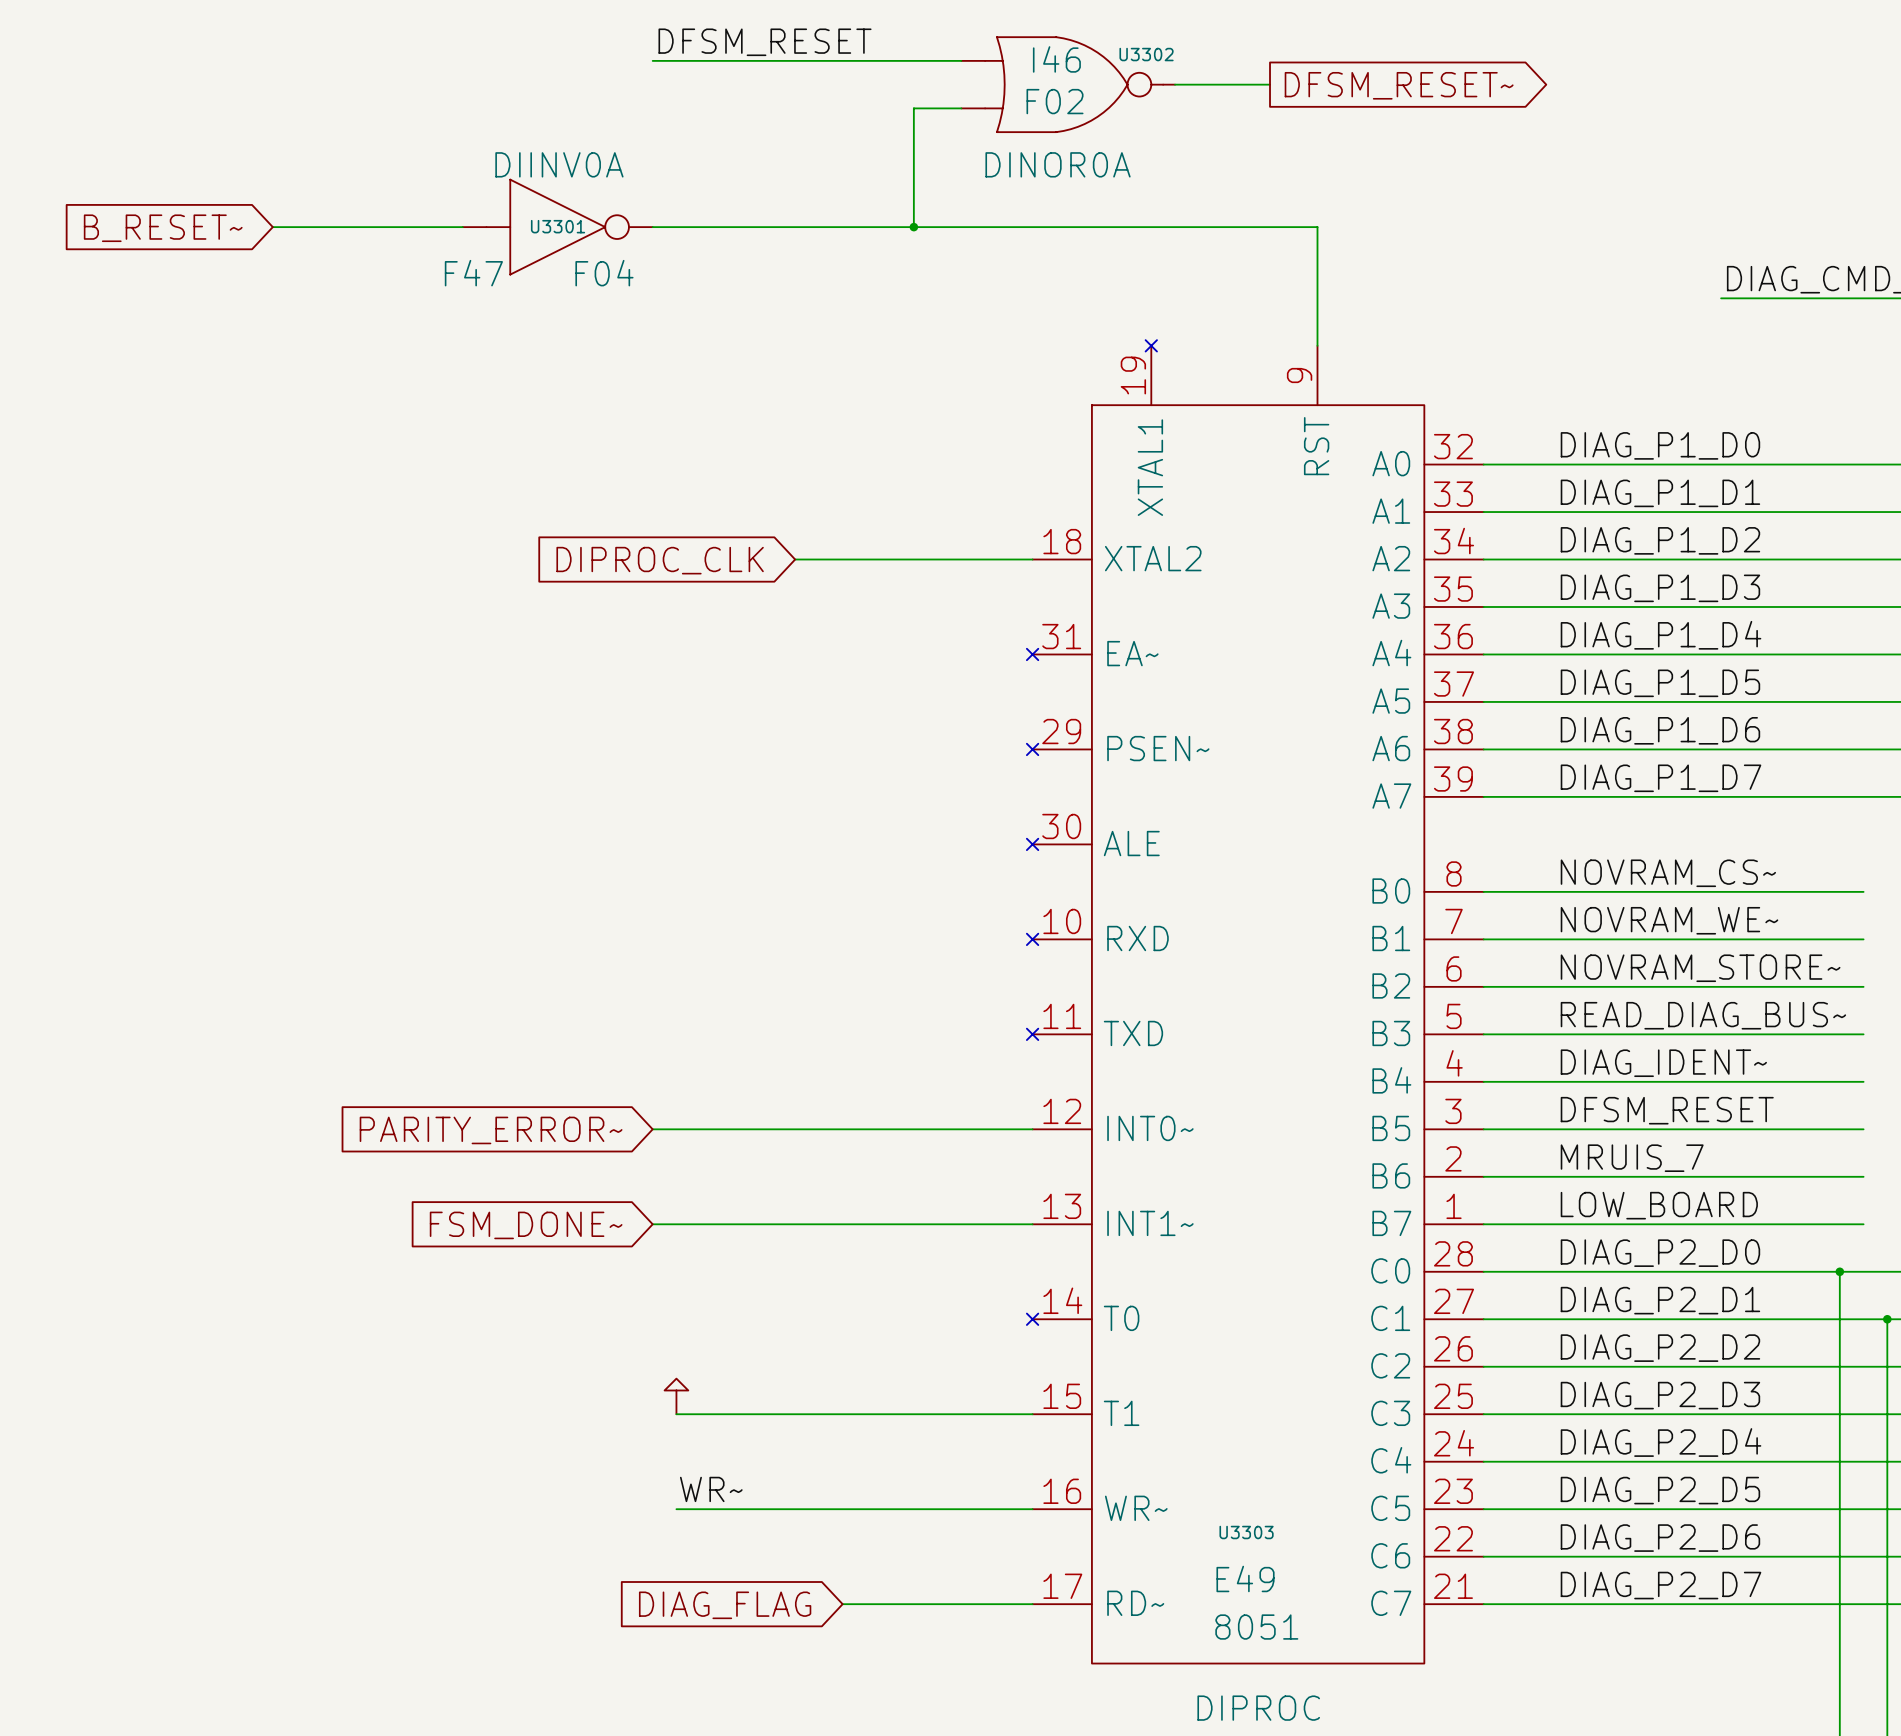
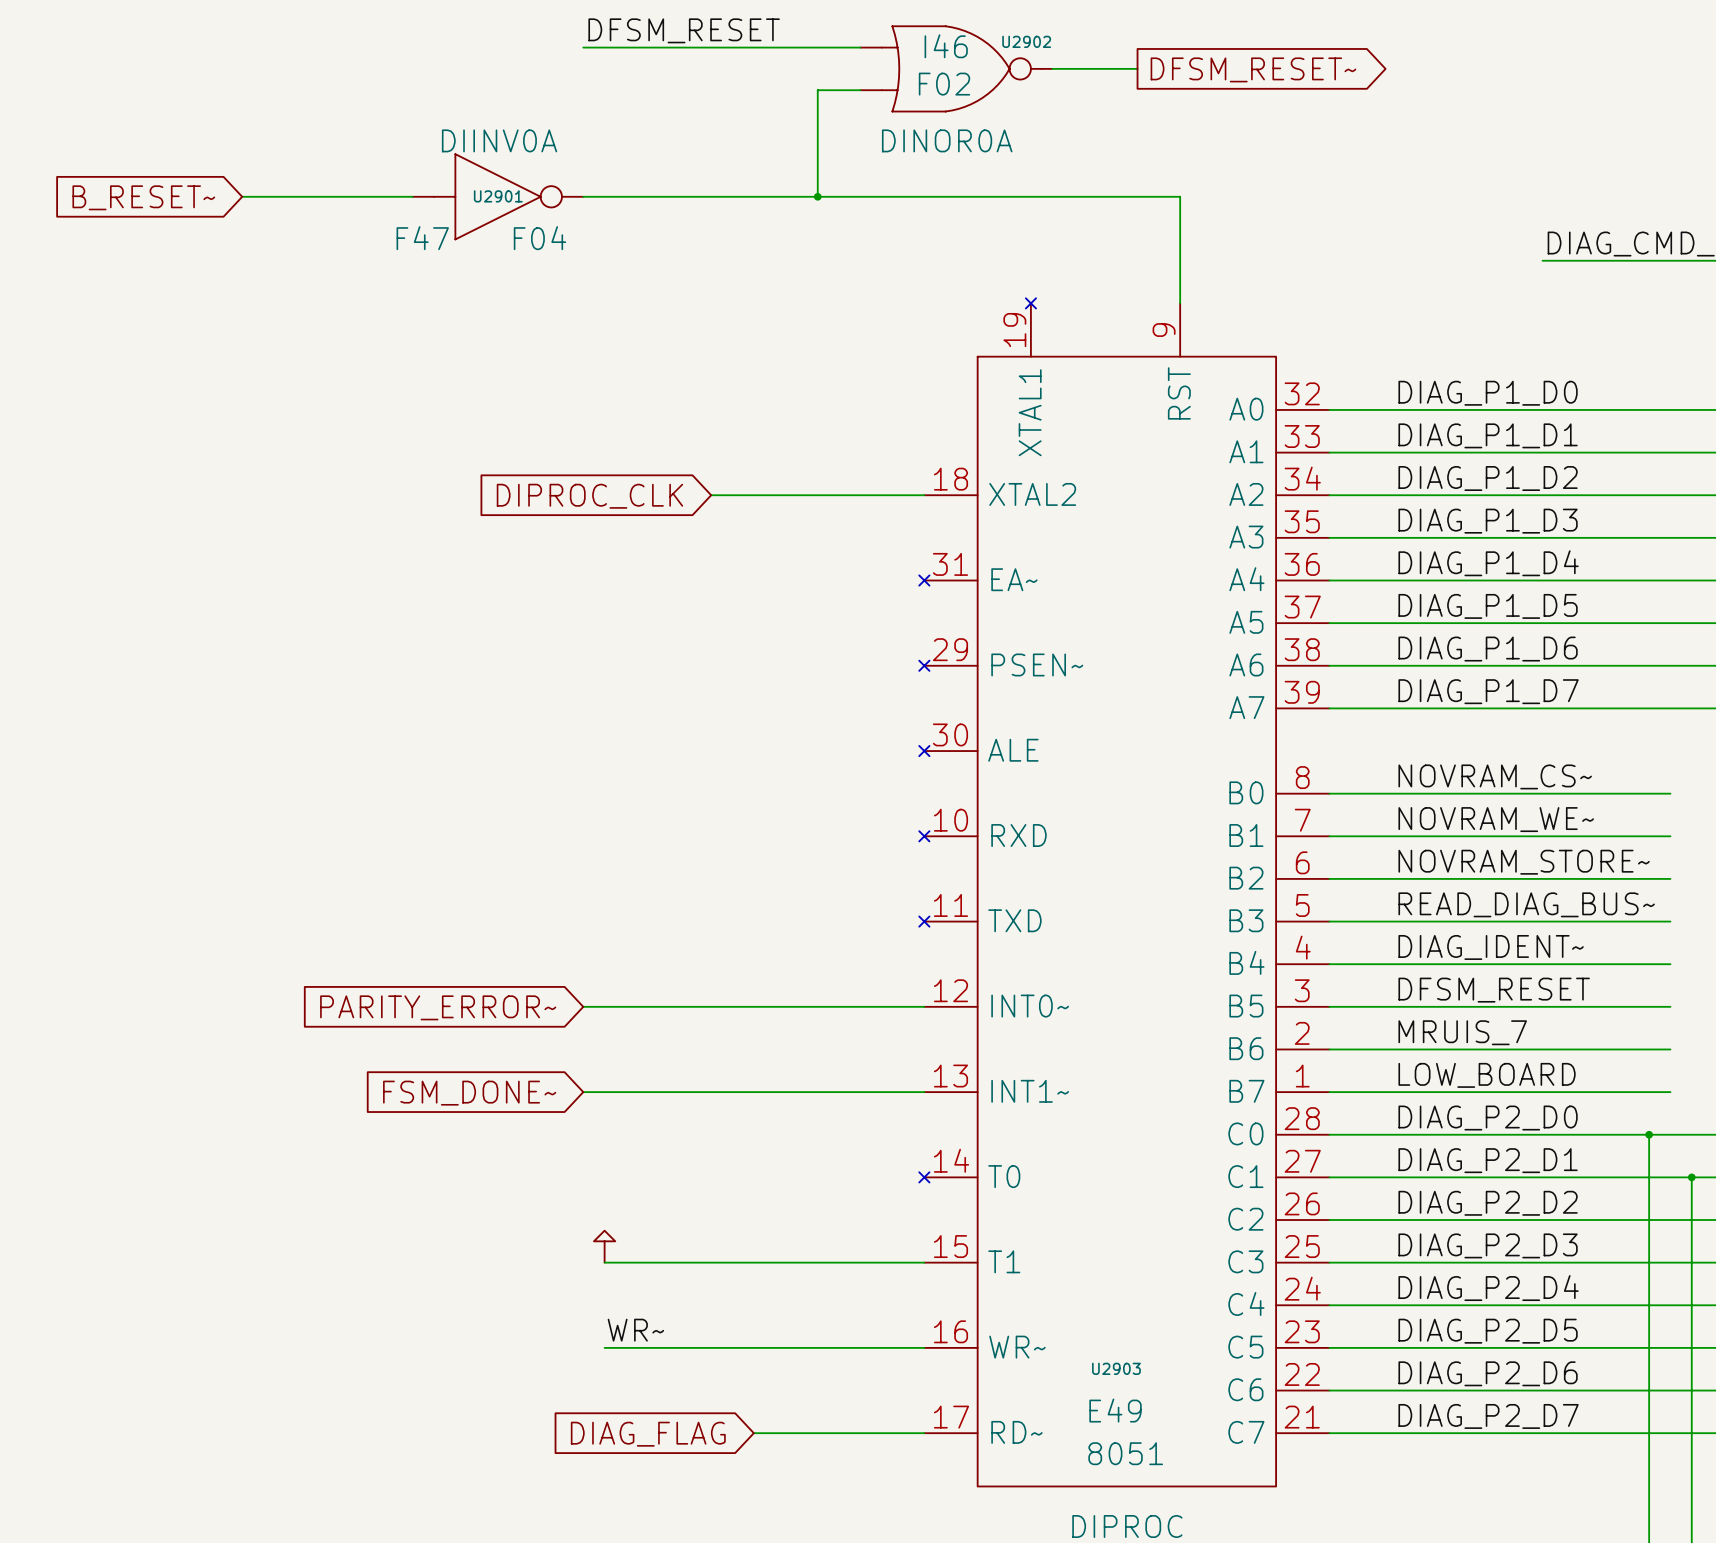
U3302 name: U3302 (1146, 54) -> U2902 (1026, 41)
U3301 name: U3301 (558, 226) -> U2901 (498, 196)
U3303 name: U3303 (1246, 1532) -> U2903 (1116, 1368)

